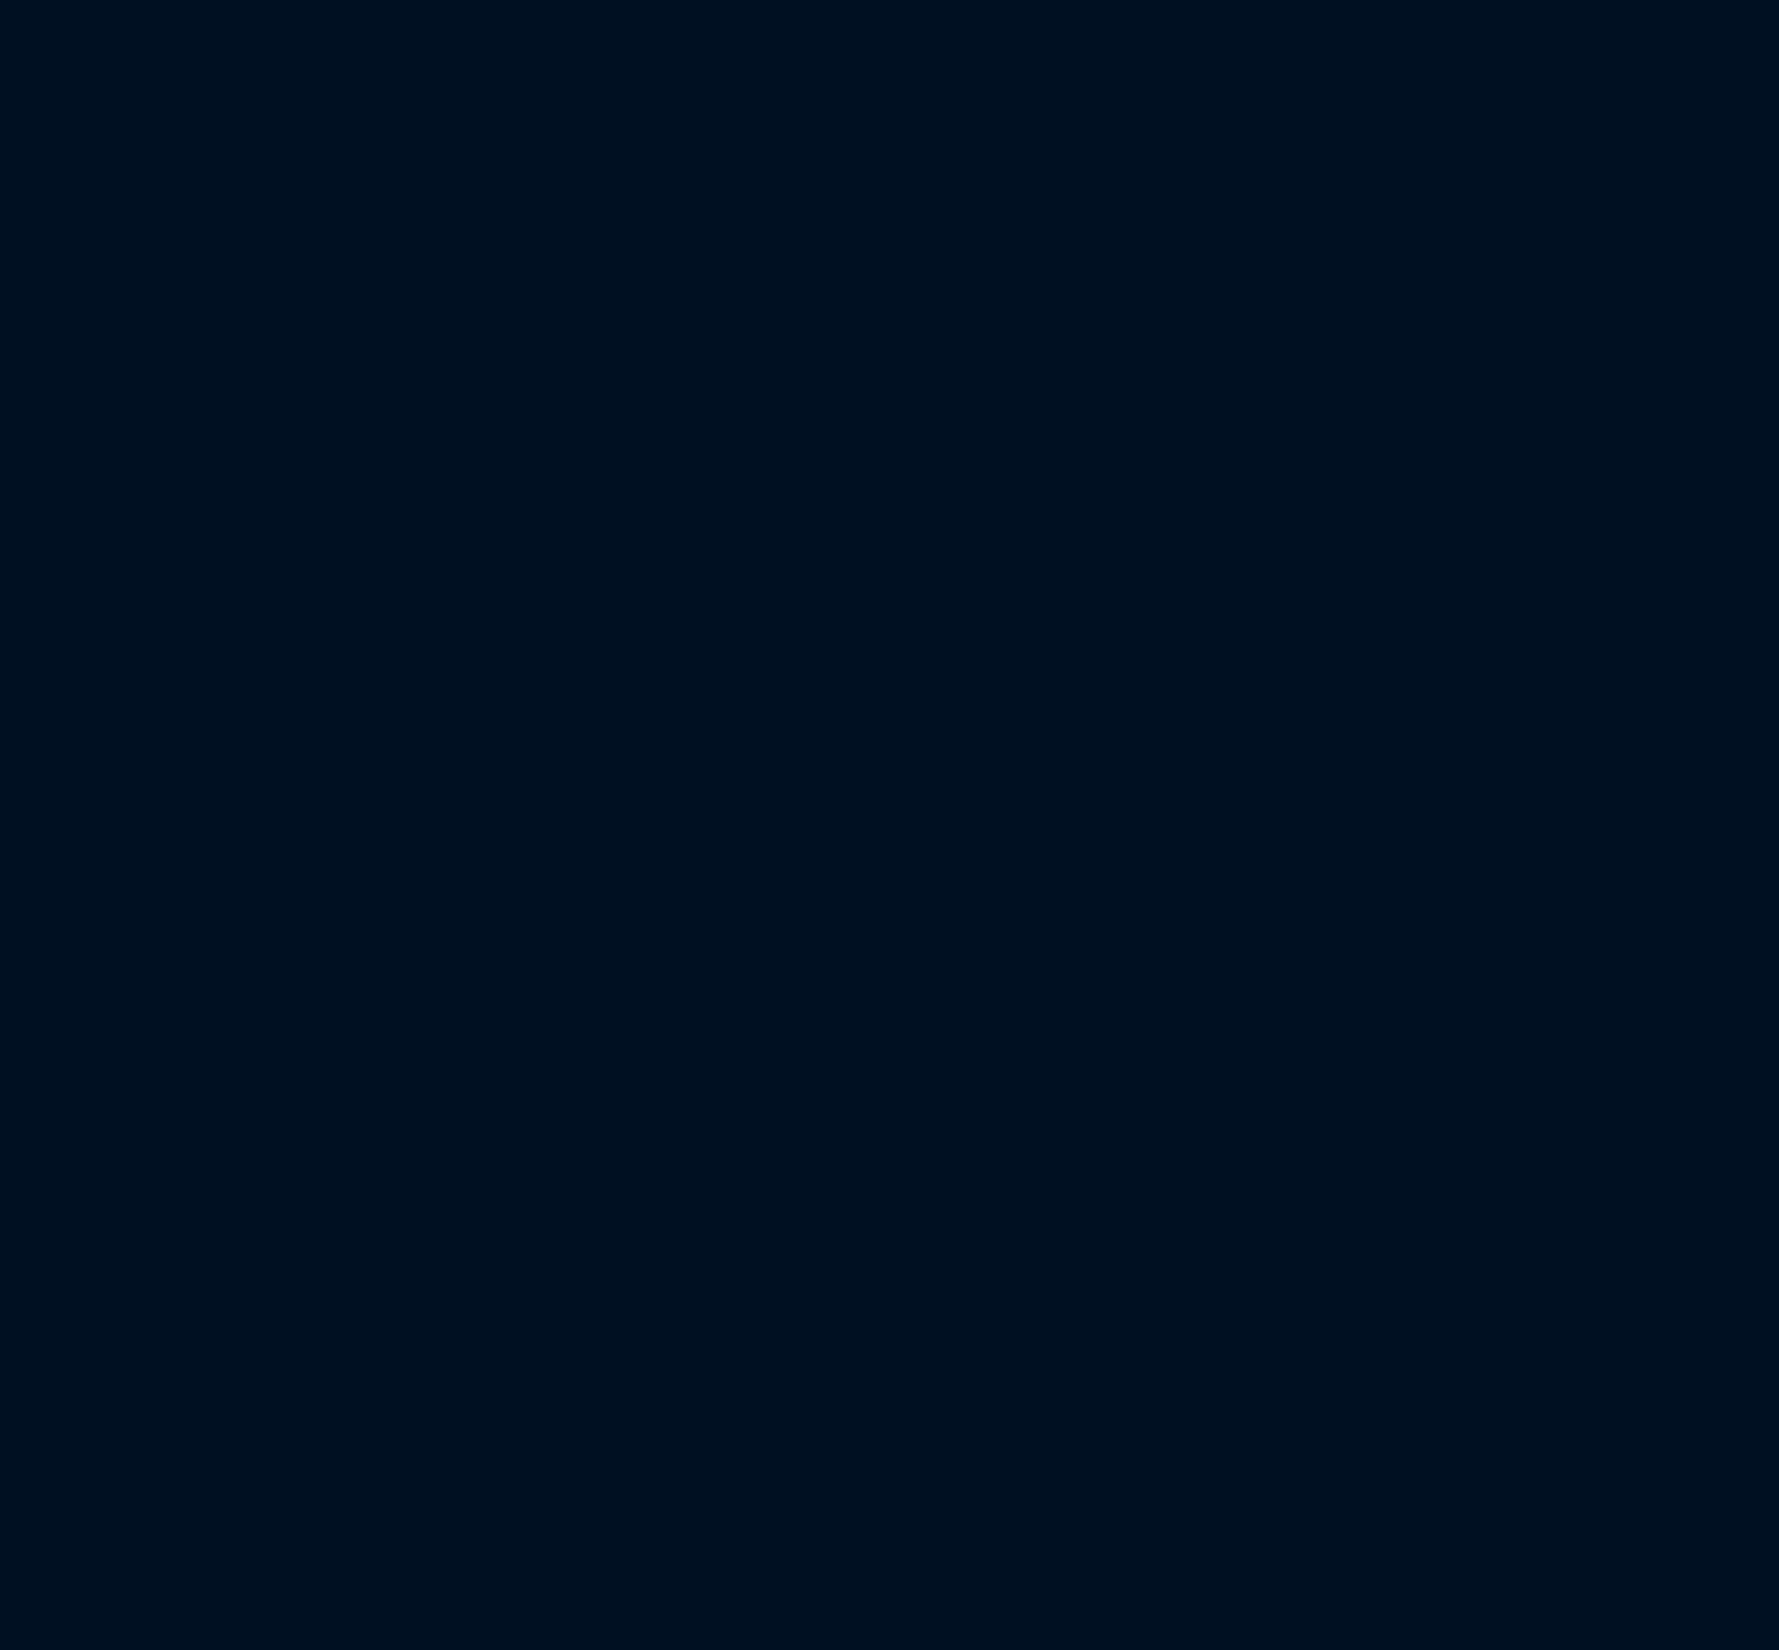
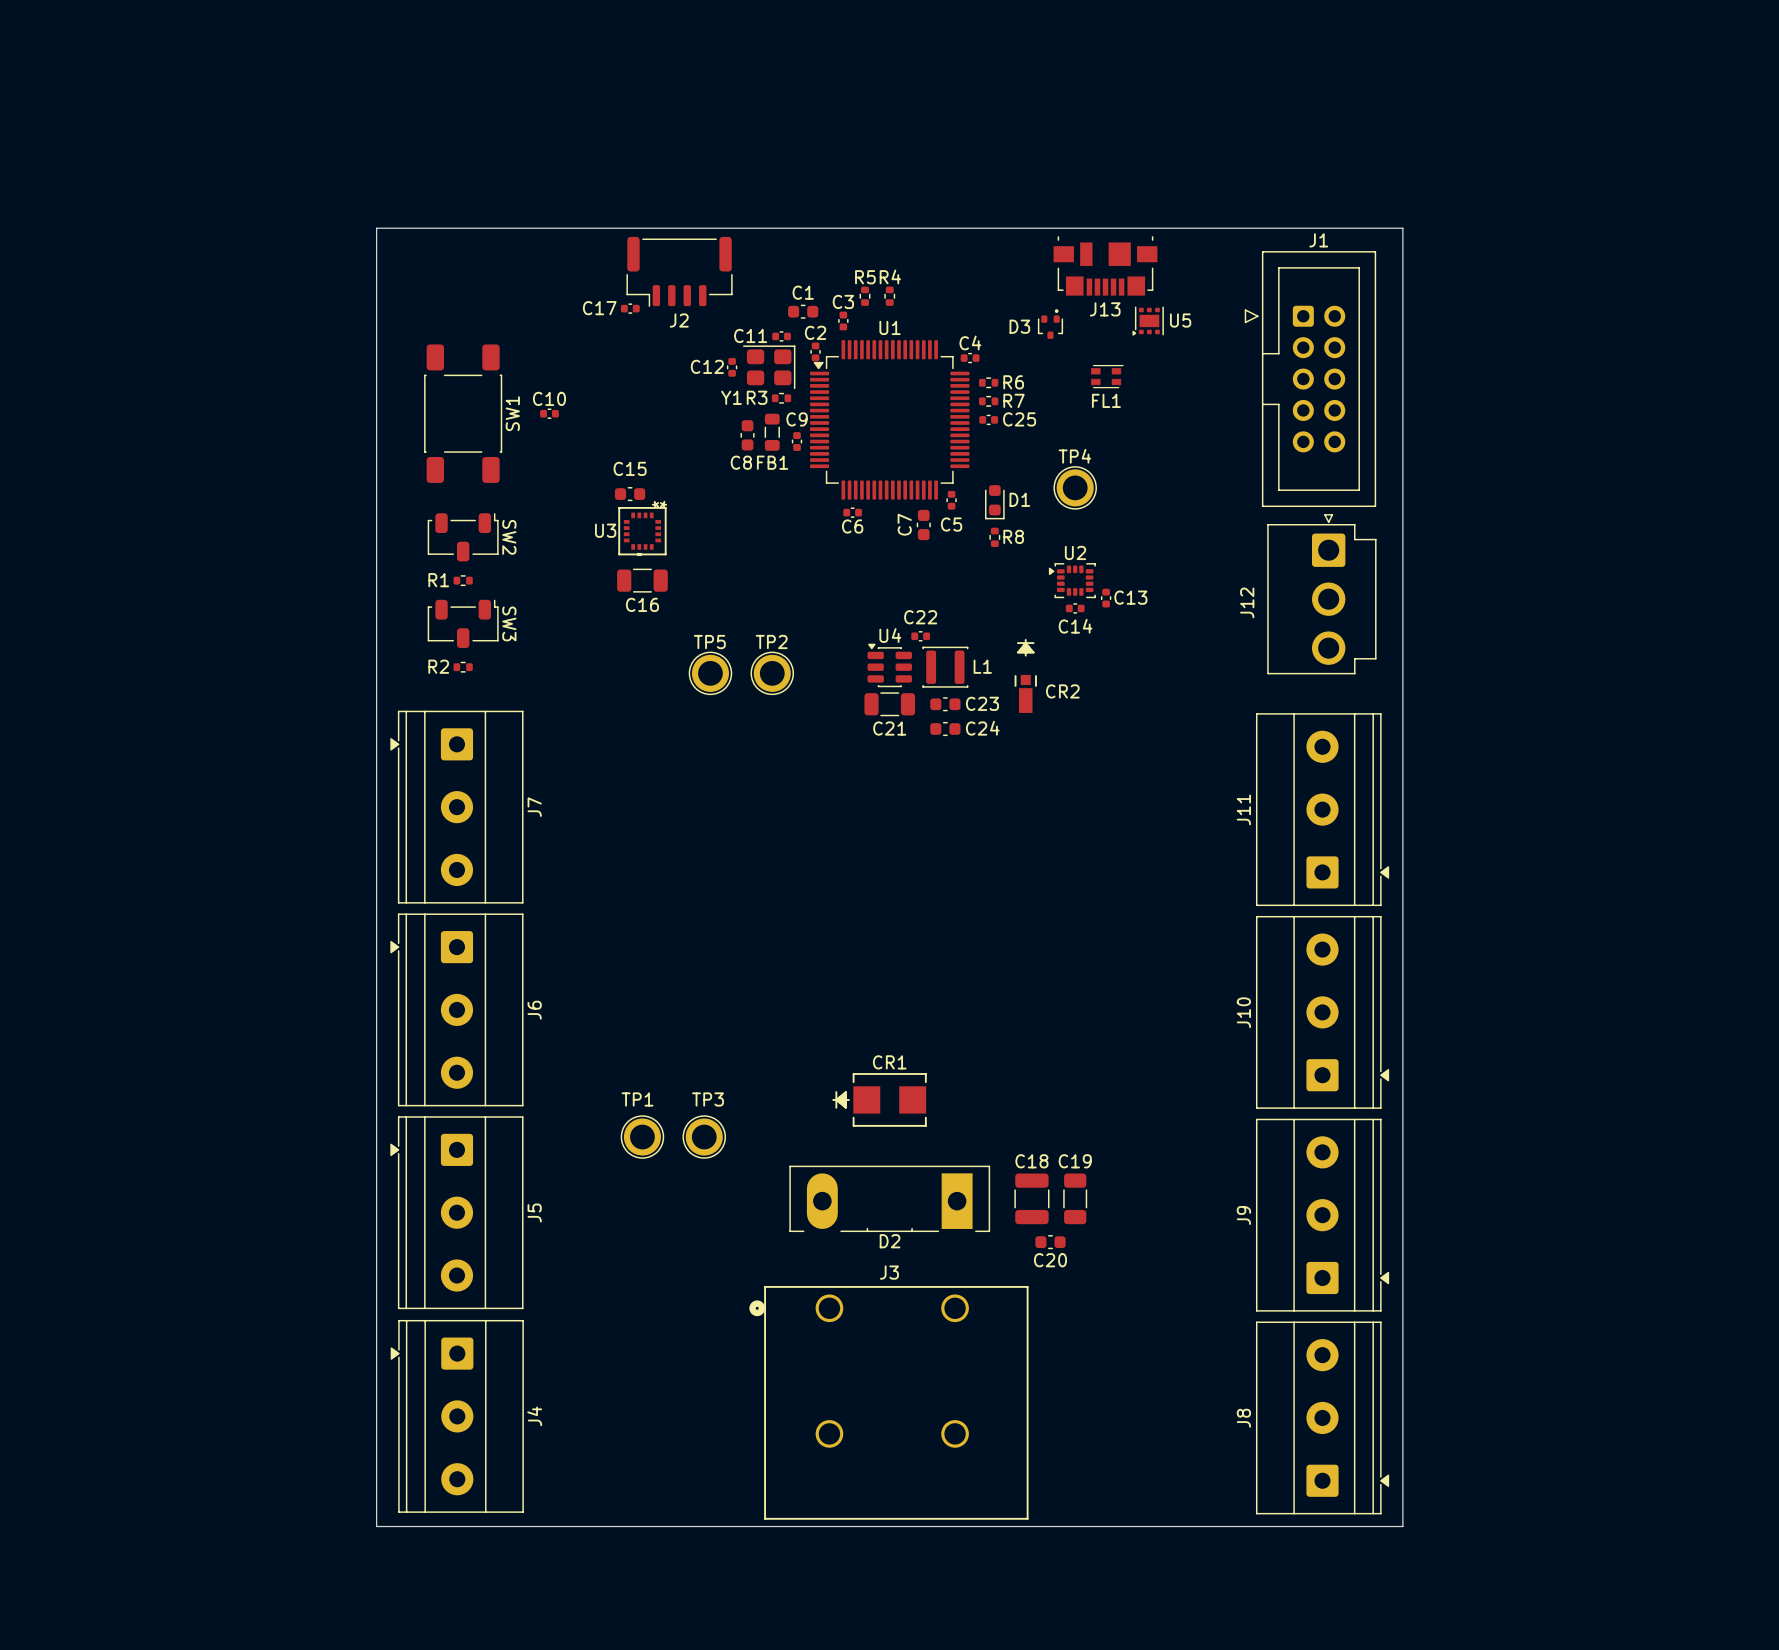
board edge: none -> (376, 228) (1402, 228) (1402, 1526) (376, 1526) (376, 228)
J13: none -> (1105, 265)
J2: none -> (679, 271)
R5: none -> (865, 296)
R4: none -> (889, 296)
C17: none -> (630, 308)
C1: none -> (803, 311)
C3: none -> (843, 320)
U5: none -> (1148, 321)
D3: none -> (1050, 324)
C11: none -> (781, 336)
C2: none -> (815, 351)
C4: none -> (970, 358)
C12: none -> (732, 367)
Y1: none -> (769, 367)
FL1: none -> (1107, 376)
J1: none -> (1310, 379)
R6: none -> (988, 382)
R3: none -> (781, 398)
R7: none -> (988, 401)
SW1: none -> (463, 413)
C10: none -> (549, 413)
U1: none -> (889, 419)
C25: none -> (988, 419)
FB1: none -> (772, 432)
C8: none -> (747, 435)
C9: none -> (797, 441)
TP4: none -> (1075, 487)
C15: none -> (630, 494)
C5: none -> (951, 500)
D1: none -> (994, 502)
C6: none -> (852, 512)
C7: none -> (923, 524)
U3: none -> (642, 531)
SW2: none -> (463, 537)
R8: none -> (994, 537)
R1: none -> (463, 580)
C16: none -> (642, 580)
U2: none -> (1072, 580)
J12: none -> (1321, 594)
C13: none -> (1106, 598)
C14: none -> (1075, 608)
SW3: none -> (463, 623)
C22: none -> (920, 636)
U4: none -> (889, 665)
R2: none -> (463, 667)
L1: none -> (945, 667)
TP5: none -> (710, 673)
TP2: none -> (772, 673)
CR2: none -> (1025, 675)
C21: none -> (889, 704)
C23: none -> (945, 704)
C24: none -> (945, 729)
J7: none -> (456, 807)
J11: none -> (1322, 809)
J6: none -> (456, 1009)
J10: none -> (1322, 1012)
CR1: none -> (879, 1099)
TP1: none -> (642, 1137)
TP3: none -> (704, 1137)
D2: none -> (889, 1198)
C18: none -> (1031, 1198)
C19: none -> (1075, 1198)
J5: none -> (456, 1212)
J9: none -> (1322, 1215)
C20: none -> (1050, 1242)
J3: none -> (888, 1402)
J4: none -> (457, 1416)
J8: none -> (1322, 1417)

